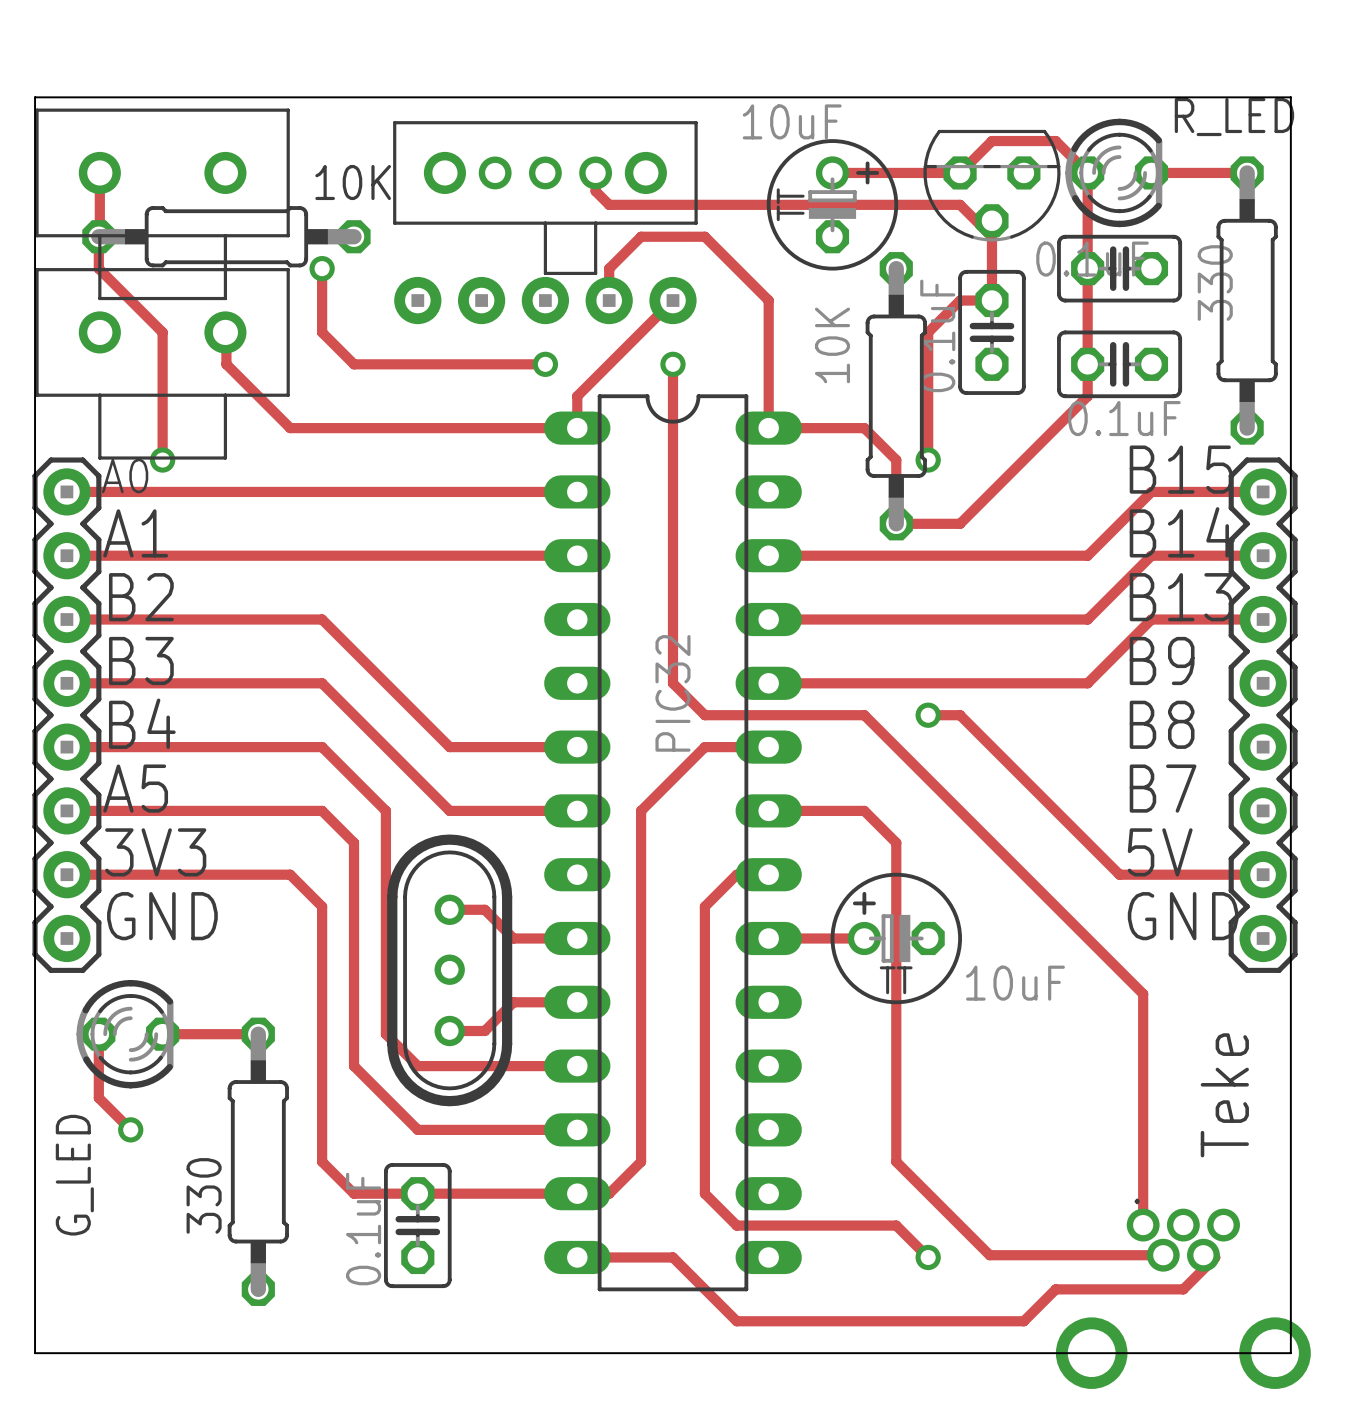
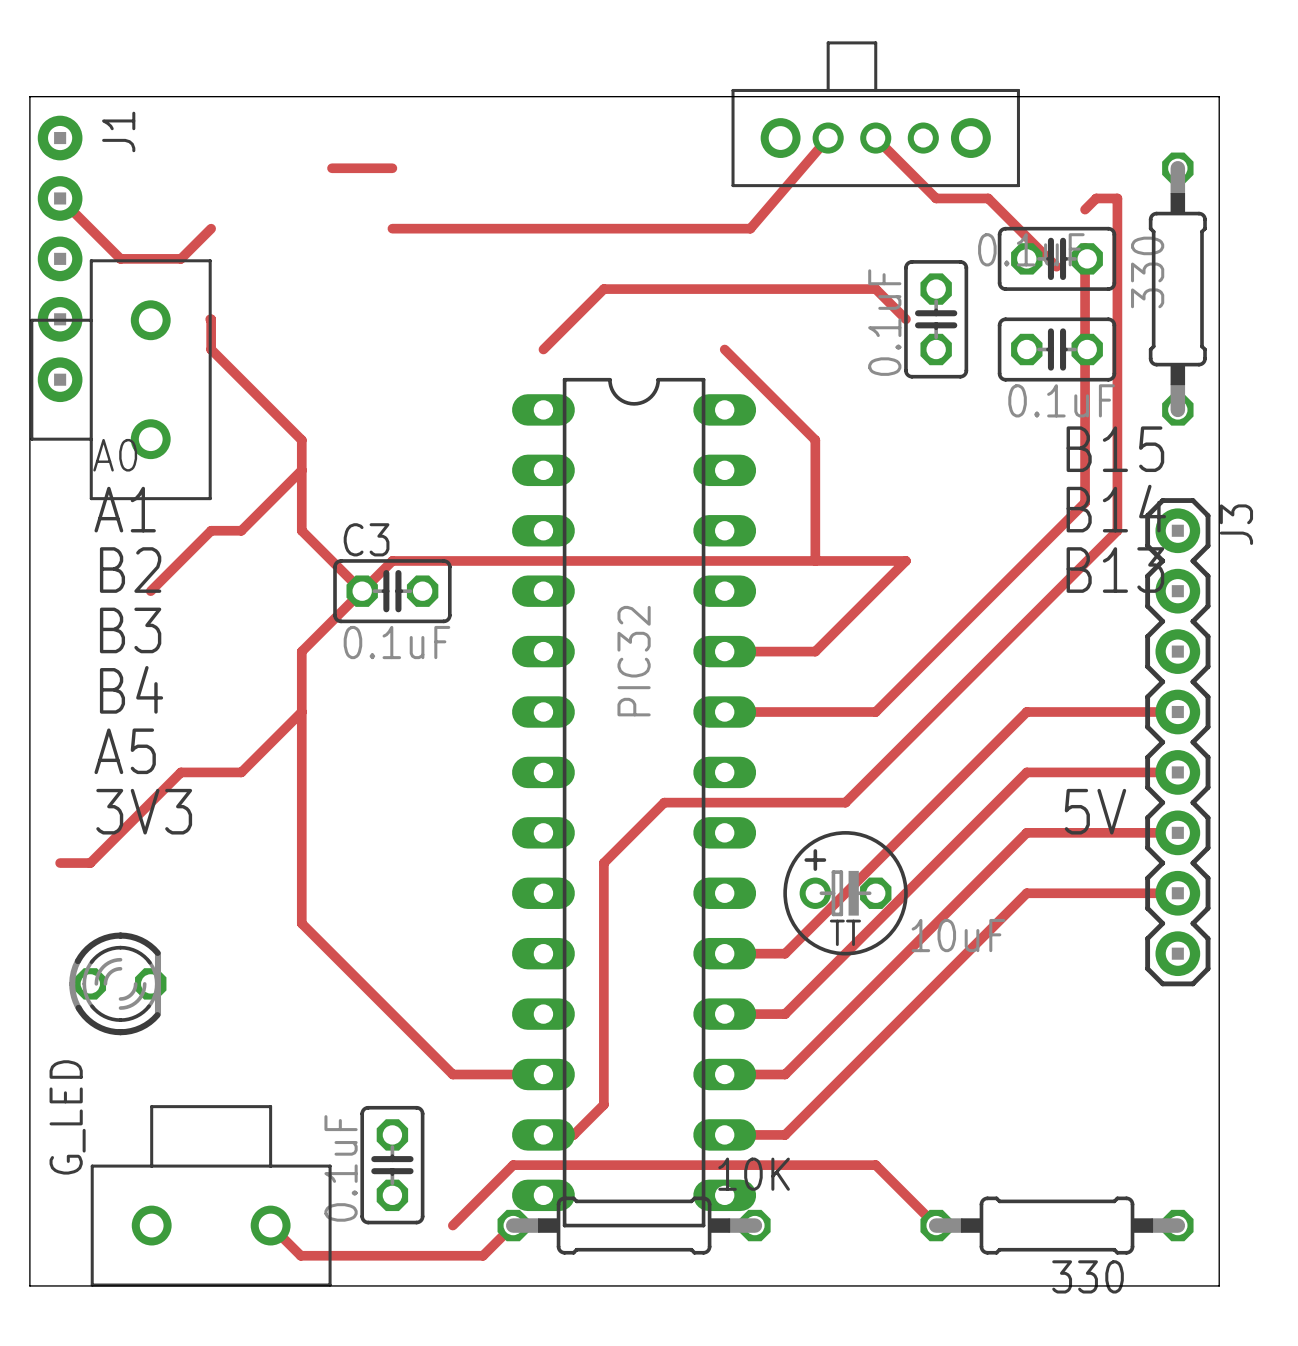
track: none -> (875, 138) (936, 198) (988, 198) (1056, 266)
track: (99, 172) (98, 268) (162, 332) (162, 460) -> none
track: none -> (331, 168) (392, 168)
track: (595, 172) (595, 191) (609, 204) (960, 204) (991, 236) -> none
track: (832, 172) (960, 172) (991, 141) (1055, 141) (1087, 172) (1087, 396) (960, 523) (896, 523) (896, 460) (864, 428) (768, 428) (768, 300) (704, 236) -> (828, 138) (750, 228) (664, 228)
R_LED: (1116, 172) -> none
track: (1151, 172) (1247, 172) -> none
part: (992, 185) -> none
part rotation: 0° (545, 198) -> 180° (875, 114)
part position: (545, 198) -> (875, 114)
track: none -> (60, 198) (120, 258) (180, 258) (211, 228)
part: (162, 204) -> none
part: 10uF (832, 204) -> none
track: (991, 220) (991, 300) (960, 300) (928, 332) (928, 460) -> none
10K position: (226, 236) -> (634, 1225)
track: (641, 236) (609, 268) (609, 300) -> (603, 228) (392, 228)
track: none -> (1085, 247) (1085, 502) (875, 712) (724, 712)
J1: none -> (60, 258)
track: (322, 268) (322, 332) (354, 364) (545, 364) -> none
via: (322, 268) -> none
part: (545, 300) -> none
track: (672, 300) (577, 396) (577, 428) (290, 428) -> (362, 591) (301, 530) (301, 440) (271, 409)
track: none -> (905, 319) (875, 289) (603, 289) (543, 349)
part rotation: 0° (162, 363) -> 90° clockwise (121, 379)
via: (545, 364) -> none
track: (672, 364) (672, 683) (704, 715) (864, 715) (1143, 994) (1143, 1225) -> none
via: (672, 364) -> none
track: none -> (724, 349) (815, 440) (815, 560)
part: 10K (896, 396) -> none
via: (162, 460) -> none
via: (928, 460) -> none
track: (66, 491) (577, 491) -> none
track: (1263, 491) (1151, 491) (1087, 555) (768, 555) -> none
track: (66, 555) (226, 555) -> (150, 591) (211, 530)
track: (258, 555) (577, 555) -> (241, 530) (301, 470)
track: (1263, 555) (1151, 555) (1087, 619) (768, 619) -> none
track: (66, 619) (322, 619) (449, 747) (577, 747) -> none
C3: none -> 0.1uF (392, 591)
track: (1263, 619) (1151, 619) (1087, 683) (864, 683) -> none
text: B9 (1162, 660) -> none
track: (66, 683) (322, 683) (449, 810) (577, 810) -> none
part: (66, 715) -> none
track: (928, 715) (960, 715) (1119, 874) -> (724, 1074) (785, 1074) (1026, 832) (1056, 832)
via: (928, 715) -> none
part: (1263, 715) -> none
text: B8 (1162, 724) -> none
track: (66, 747) (322, 747) (385, 810) (385, 1034) -> none
track: (768, 747) (704, 747) (641, 810) (641, 906) -> (1085, 209) (1096, 198) (1117, 198) (1117, 530) (845, 802) (664, 802) (603, 863)
track: none -> (1177, 712) (1026, 712) (785, 953) (724, 953)
J3: none -> (1177, 742)
text: B7 (1163, 788) -> none
track: (66, 810) (194, 810) -> (60, 863) (90, 863) (180, 772)
track: (258, 810) (322, 810) (354, 842) (354, 1066) (417, 1129) (481, 1129) -> (241, 772) (301, 712)
track: (768, 810) (864, 810) (896, 842) (896, 1161) (989, 1255) (1163, 1255) -> none
track: none -> (1177, 772) (1026, 772) (785, 1014) (724, 1014)
track: (66, 874) (290, 874) (322, 906) -> (815, 651) (905, 560) (392, 560) (301, 651) (301, 863)
track: (768, 874) (736, 874) (704, 906) (704, 1193) (736, 1225) -> (452, 1225) (513, 1165) (694, 1165)
track: (449, 909) (484, 909) (513, 938) (577, 938) -> none
text: GND (162, 916) -> none
text: GND (1183, 916) -> none
track: (768, 938) (864, 938) -> none
track: none -> (1177, 893) (1026, 893) (785, 1134) (724, 1134)
track: (322, 970) (322, 1161) (354, 1193) (577, 1193) -> (301, 923) (362, 983)
part: (449, 970) -> none
track: (577, 1002) (513, 1002) (484, 1031) (449, 1031) -> none
track: (98, 1034) (98, 1097) (130, 1129) -> none
track: (162, 1034) (258, 1034) -> none
track: (417, 1066) (577, 1066) -> (392, 1014) (452, 1074)
text: Teke (1224, 1095) -> none
via: (130, 1129) -> none
330 rotation: 0° (258, 1161) -> 90° clockwise (1056, 1225)
330 position: (258, 1161) -> (1056, 1225)
330 name position: 330 (204, 1195) -> 330 (1088, 1276)
track: (896, 1225) (928, 1257) -> (845, 1165) (875, 1165) (936, 1225)
track: (1203, 1255) (1205, 1257) (1215, 1257) (1183, 1289) (1055, 1289) (1023, 1321) (736, 1321) (672, 1257) (577, 1257) -> none
part: none -> (211, 1195)
via: (928, 1257) -> none
track: none -> (270, 1225) (300, 1255) (483, 1255) (513, 1225)
part: (1183, 1298) -> none

